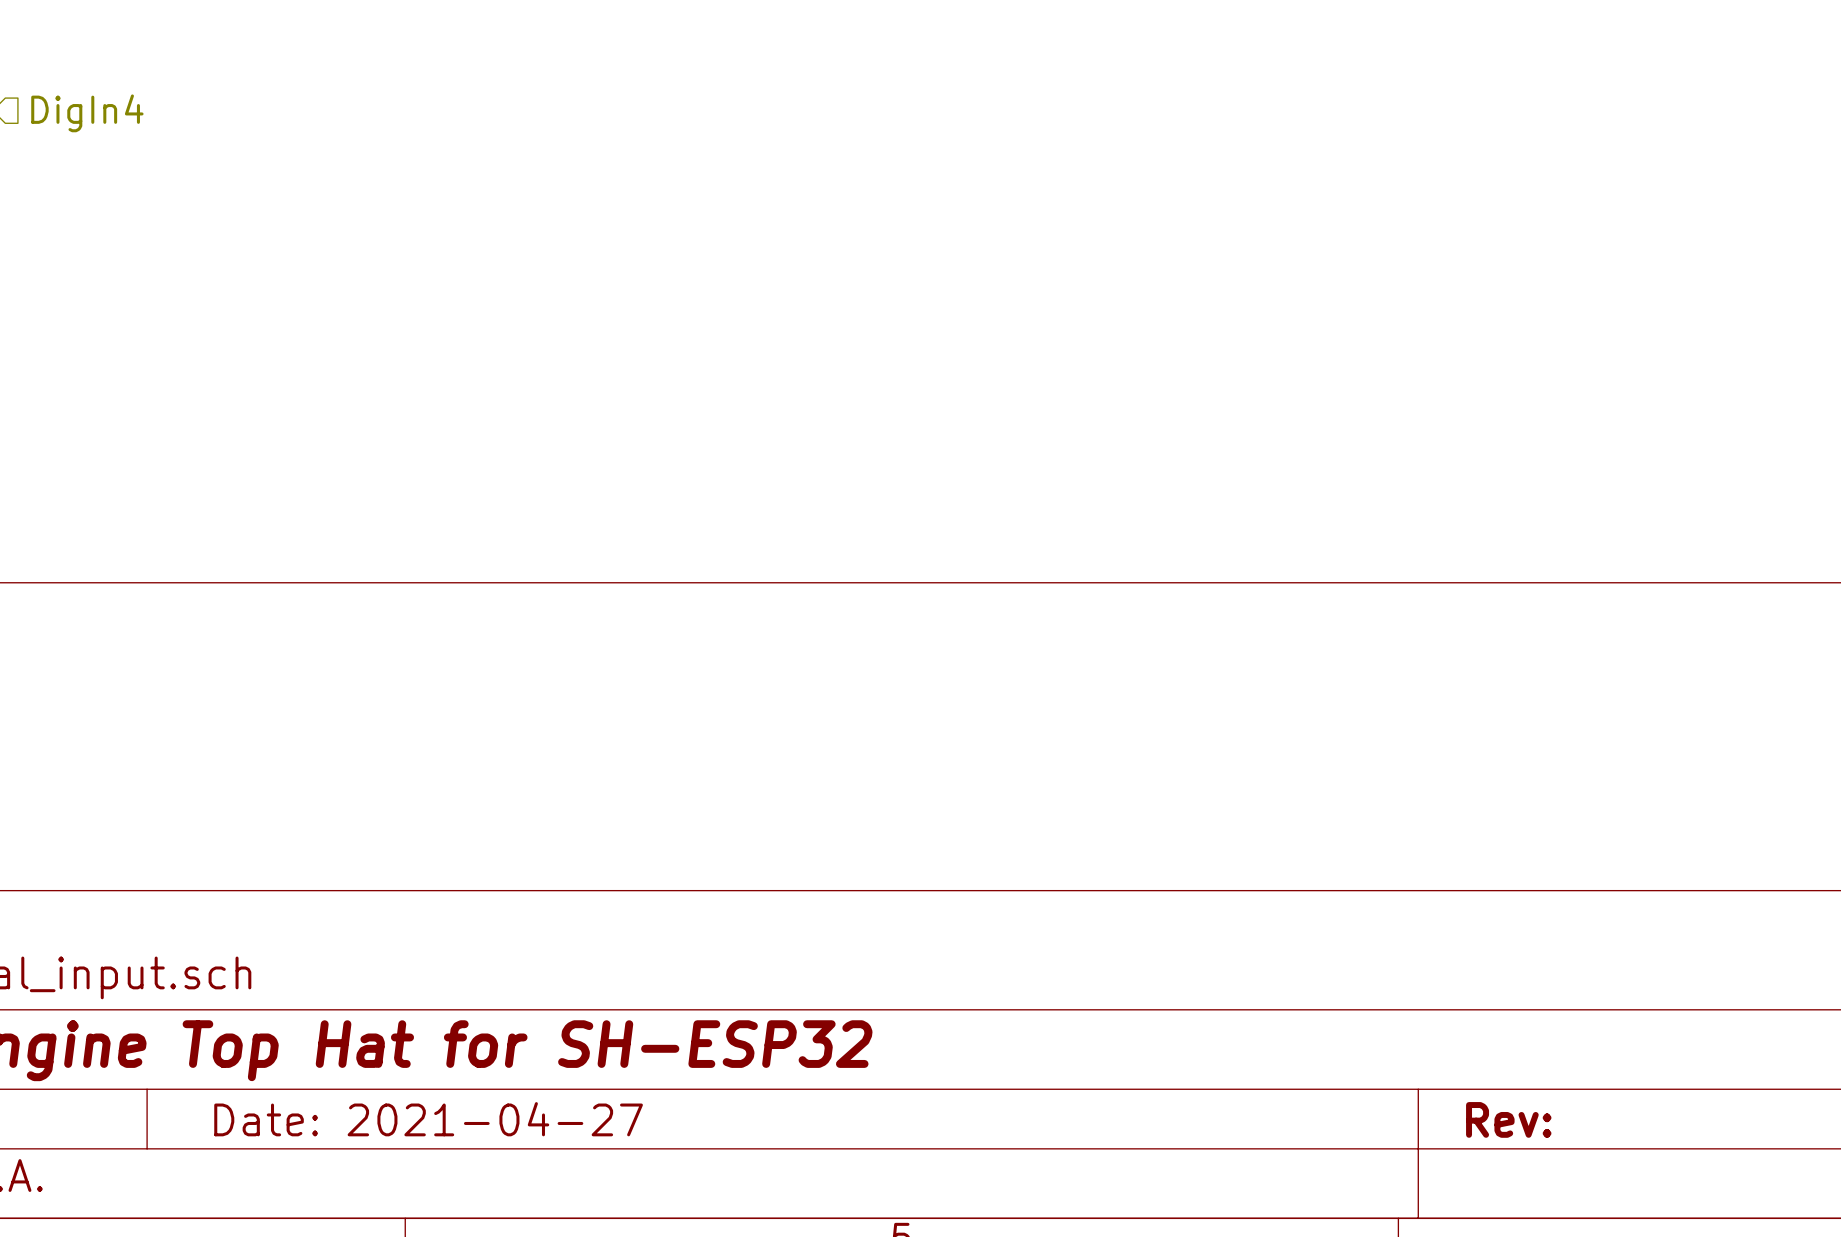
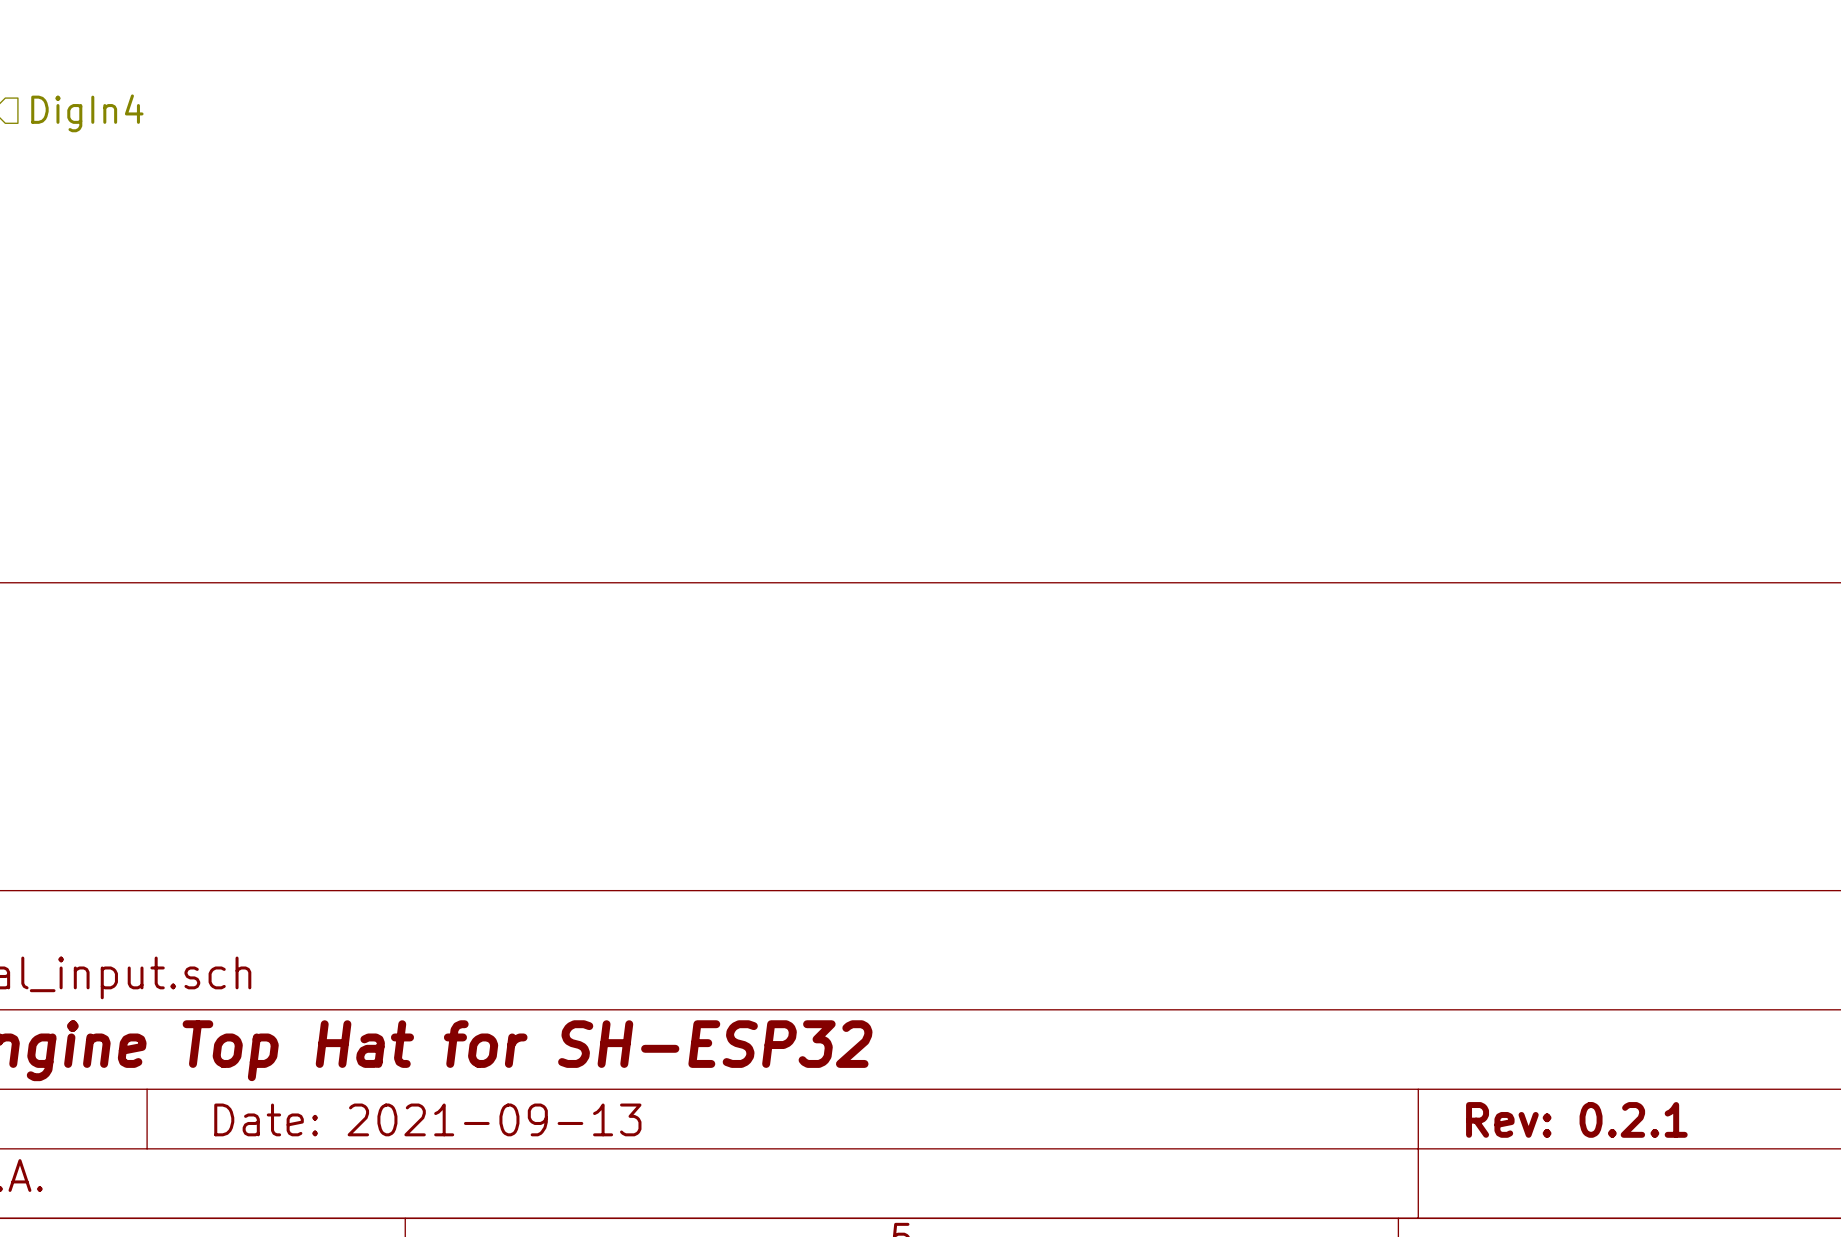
title block: Date: 2021-04-27 (428, 1119) -> Date: 2021-09-13 (427, 1119)
title block: Rev: (1508, 1119) -> Rev: 0.2.1 (1576, 1119)

